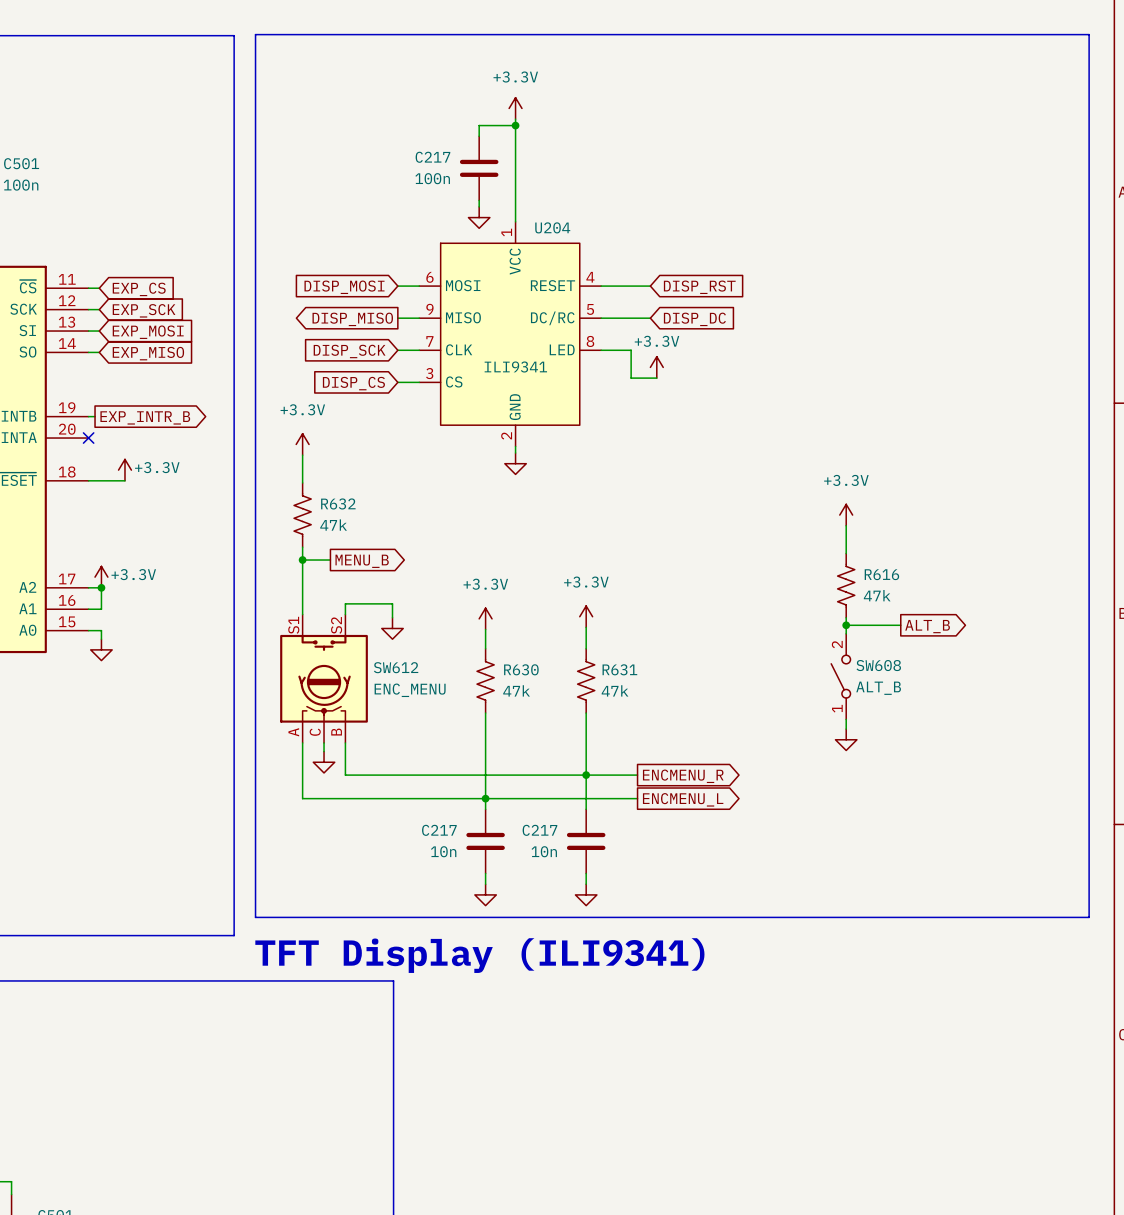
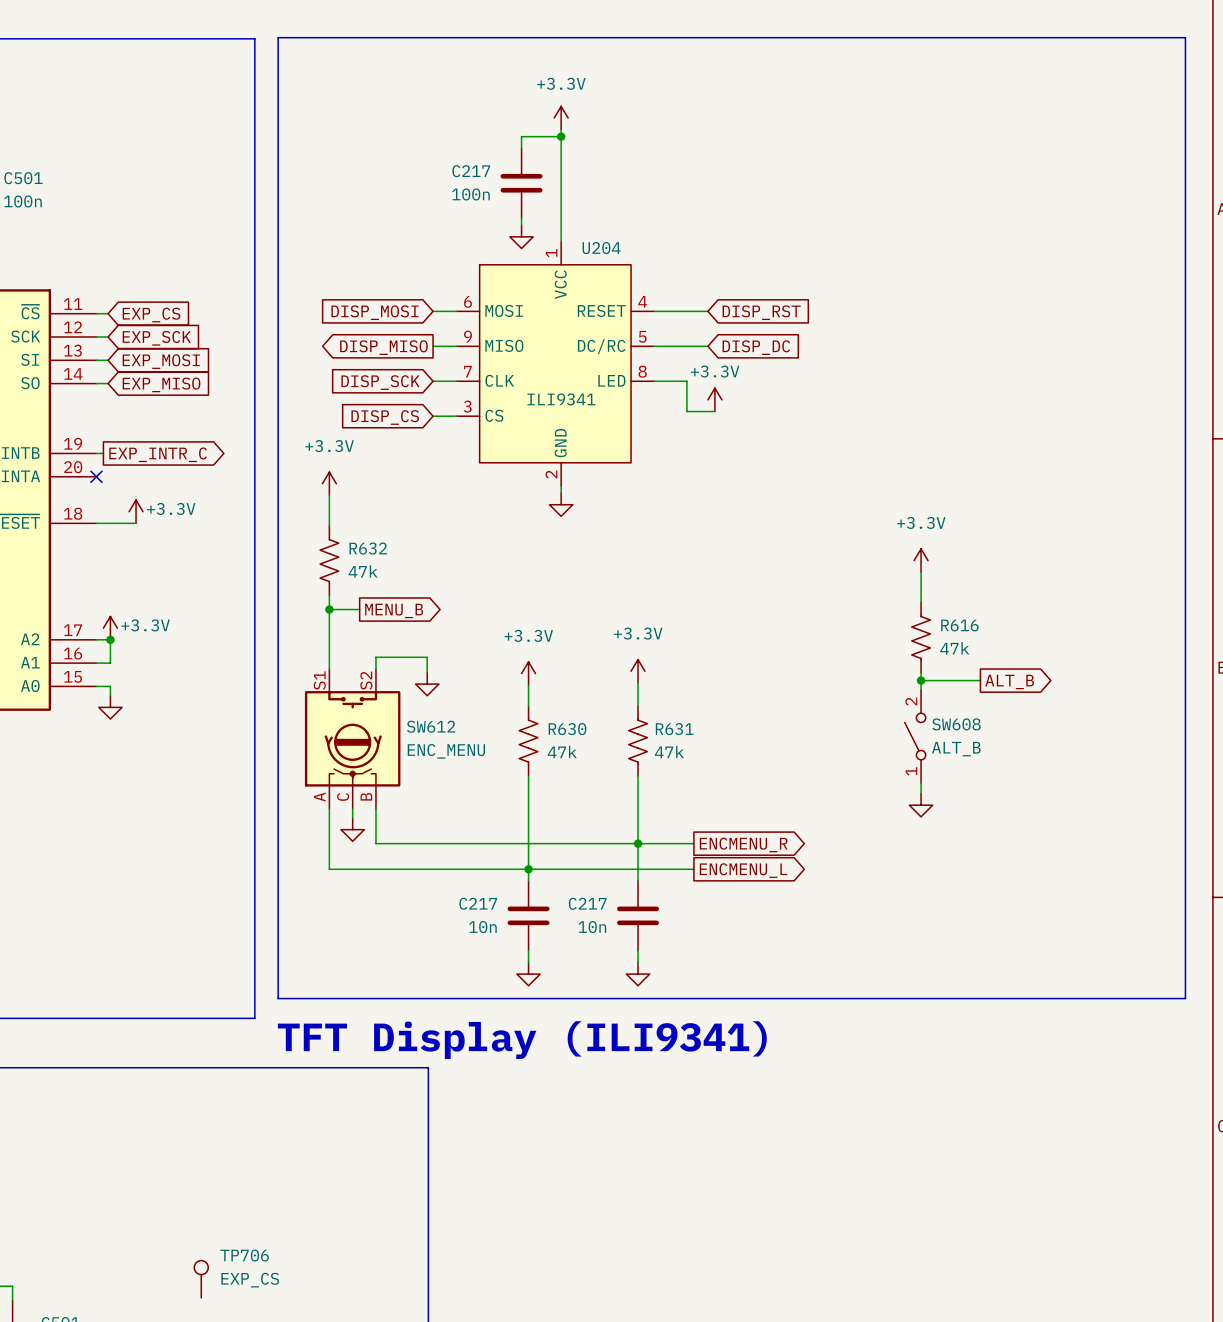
global label: EXP_INTR_B (145, 417) -> EXP_INTR_C (158, 454)
TP706: none -> EXP_CS (201, 1279)

